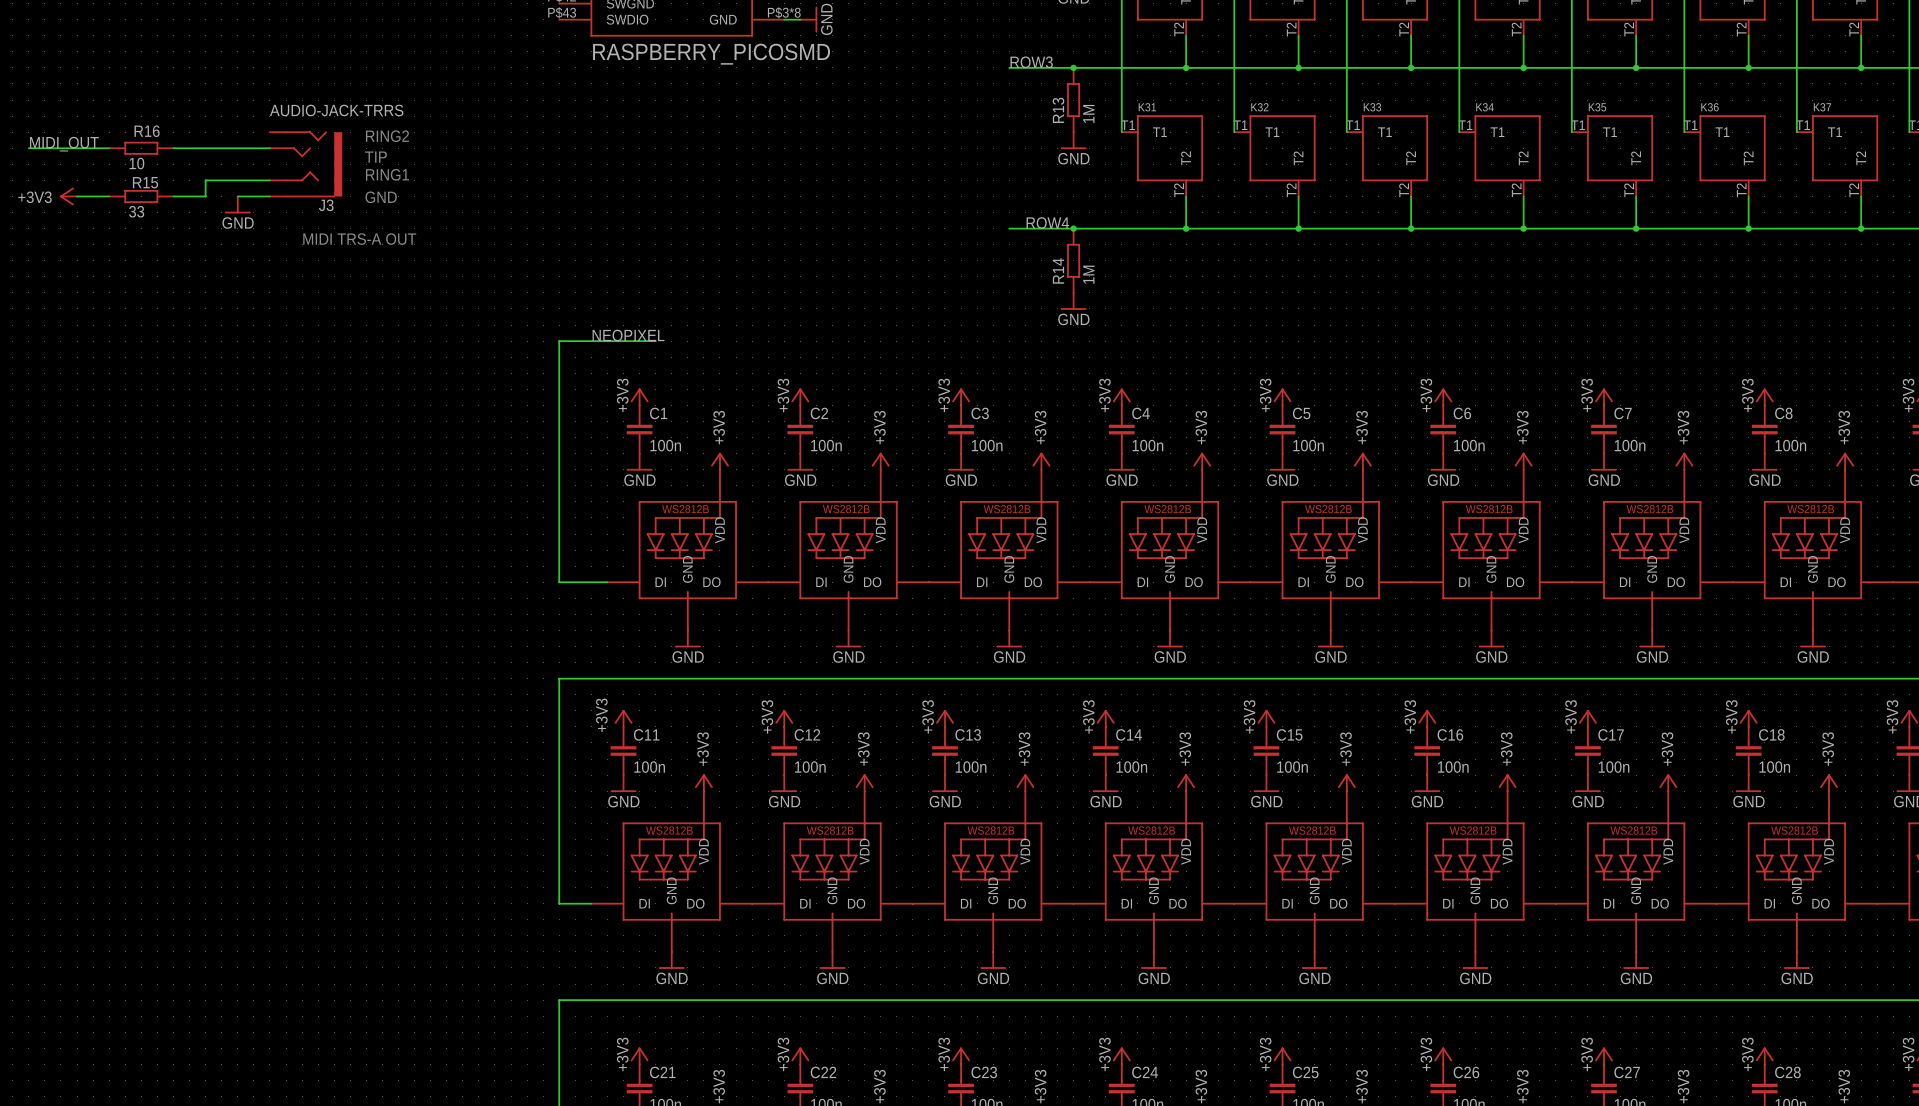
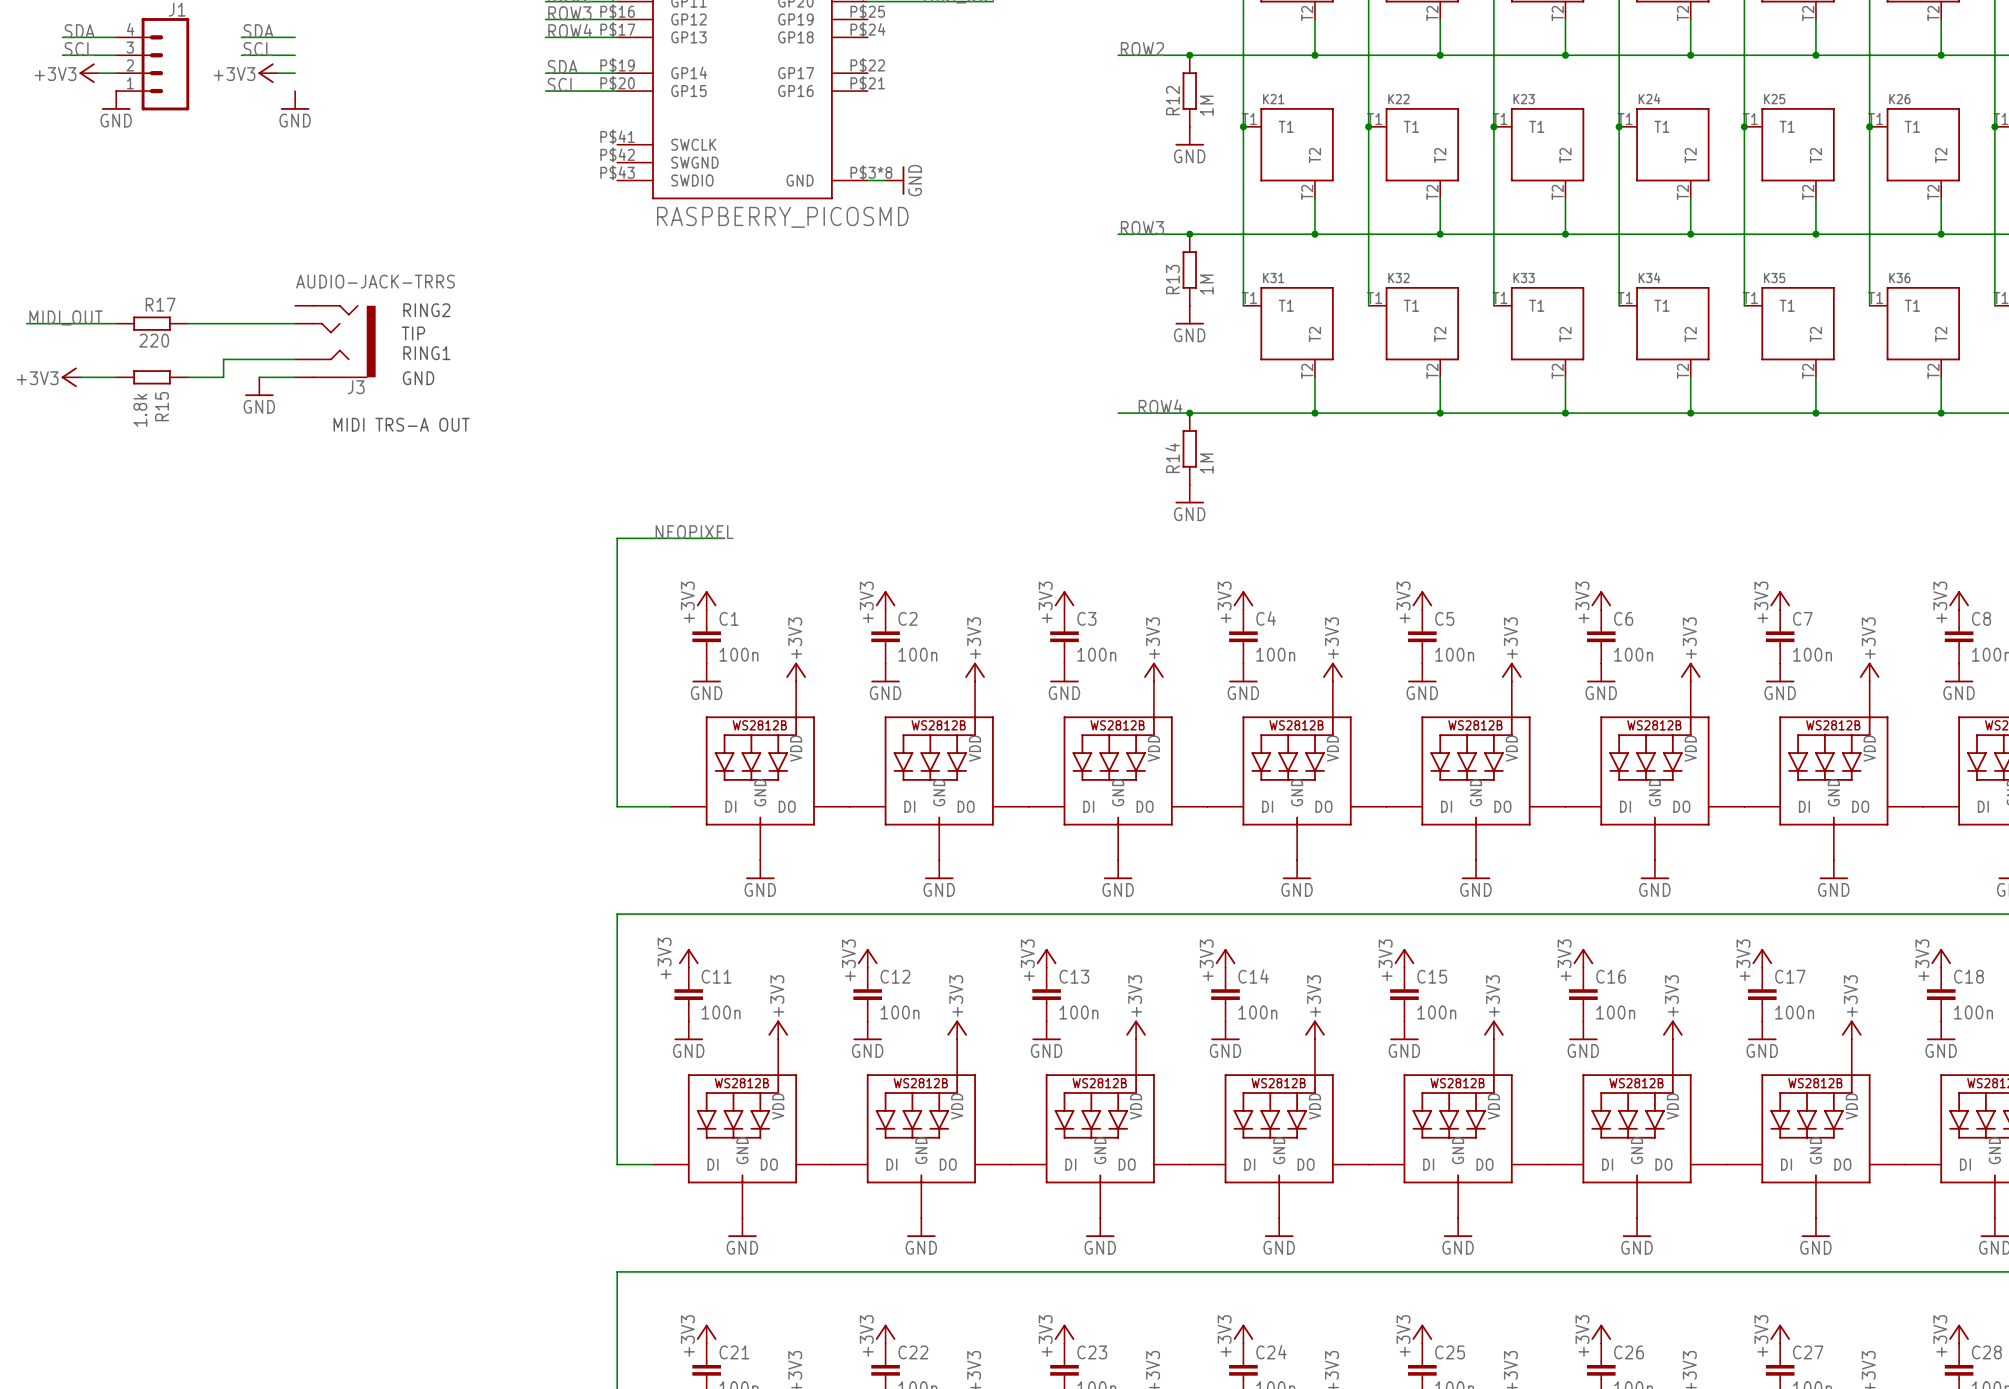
R16 name: R16 (147, 131) -> R17 (160, 304)
R16 value: 10 (136, 163) -> 220 (154, 340)
R15 name rotation: 0° (145, 182) -> 90° counterclockwise (162, 406)
R15 name position: R15 (145, 182) -> R15 (162, 406)
R15 value: 33 (136, 211) -> 1.8k (140, 410)

